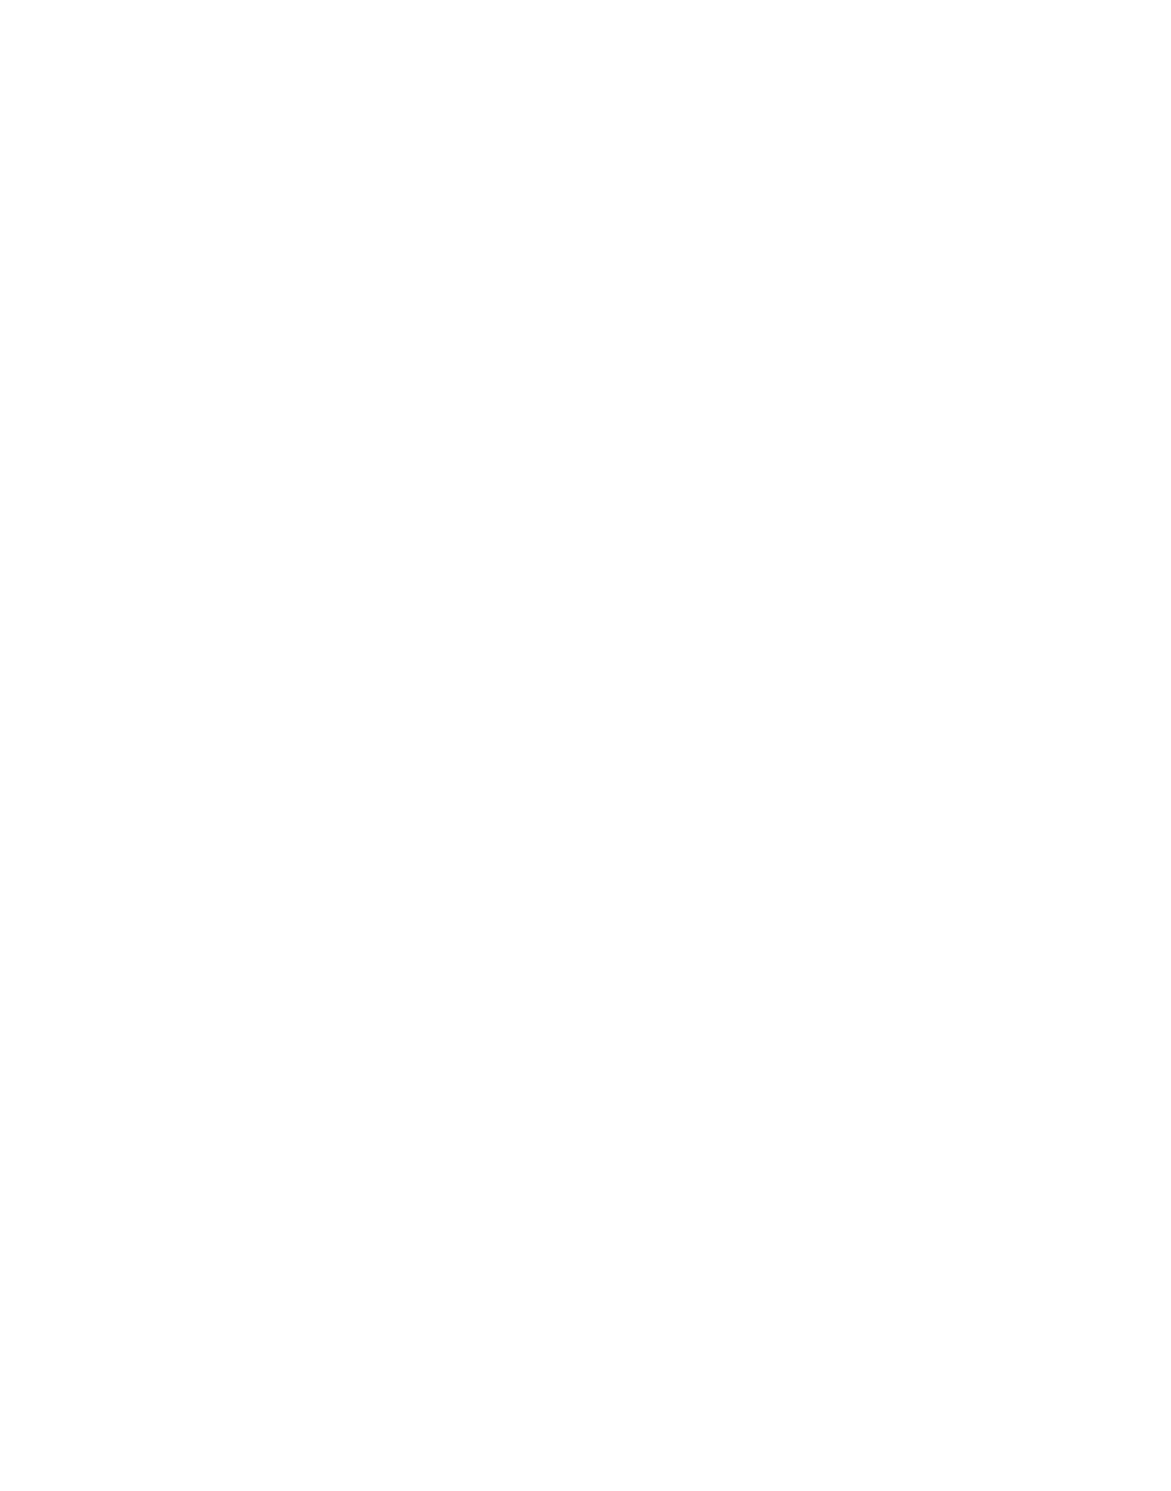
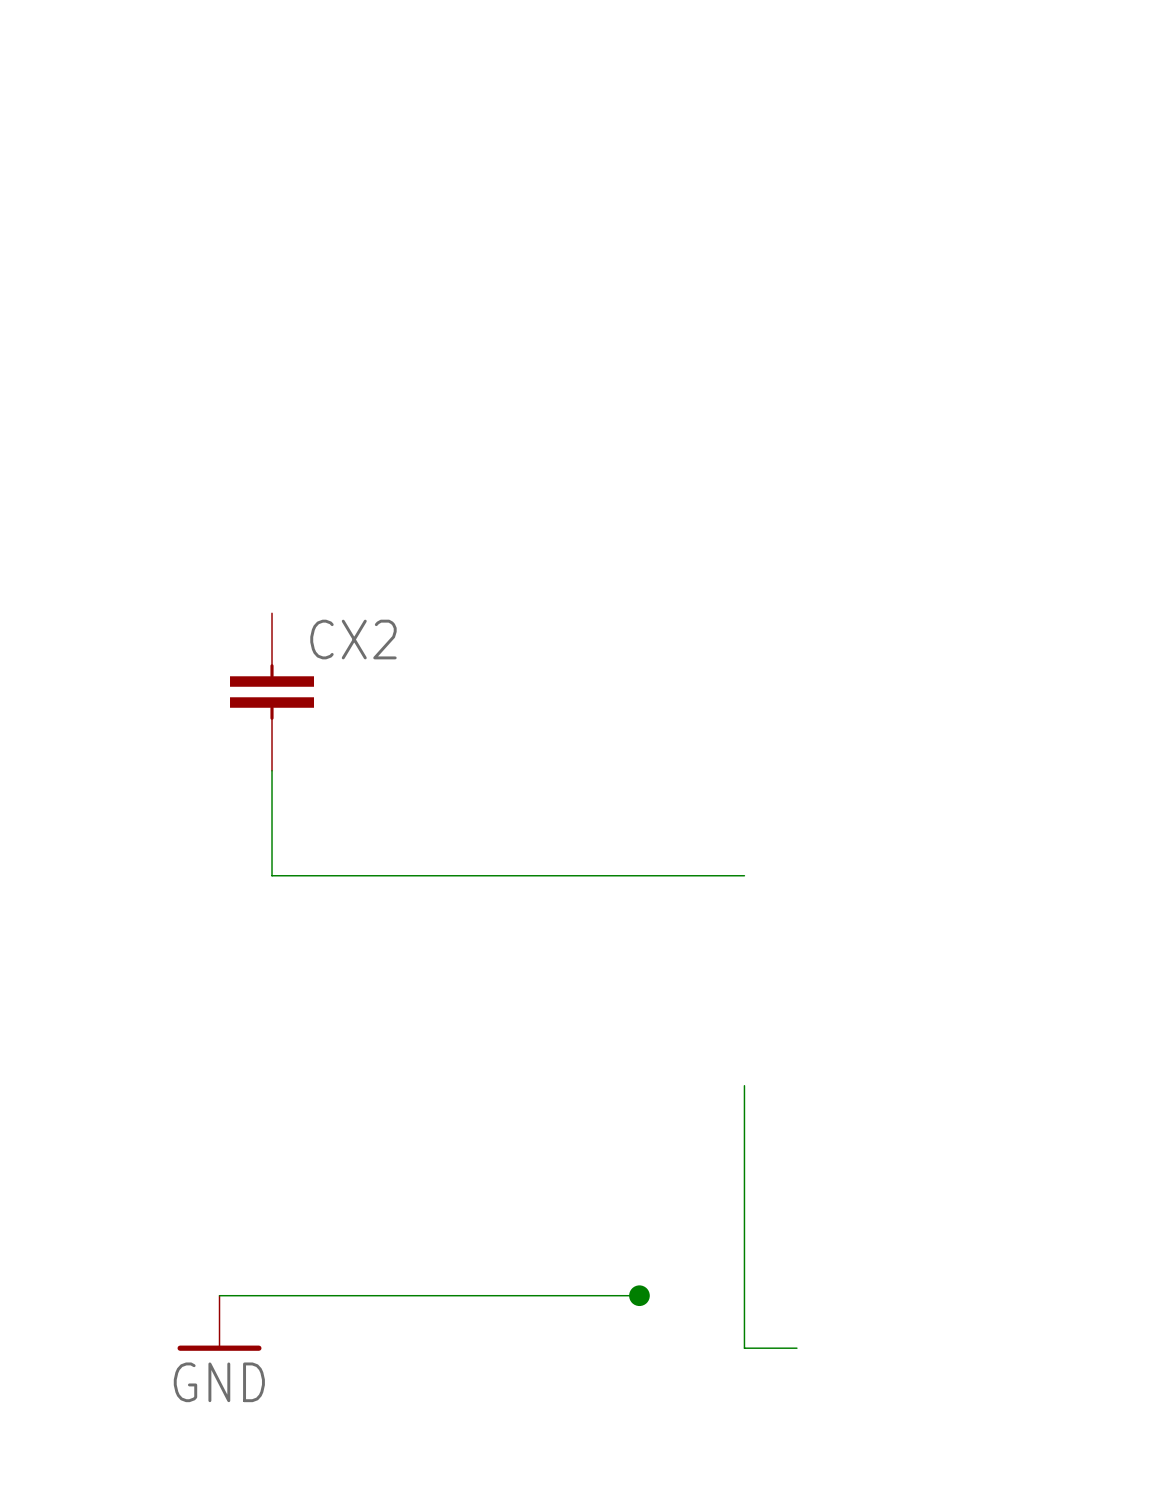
CX2: none -> (272, 692)
wire: none -> (272, 770) (272, 875) (744, 875)
wire: none -> (744, 1085) (744, 1348) (796, 1348)
wire: none -> (219, 1295) (639, 1295)
junction: none -> (639, 1295)
power symbol: none -> GND (219, 1323)

